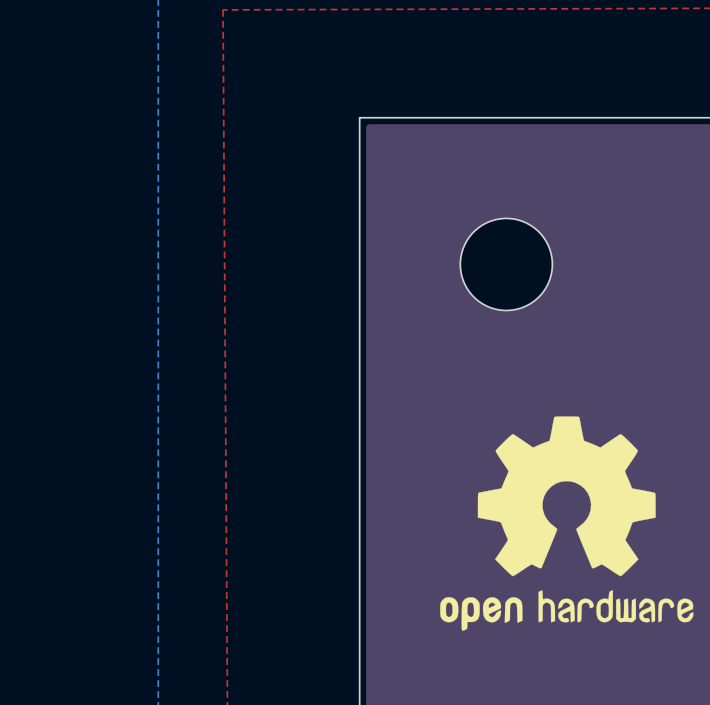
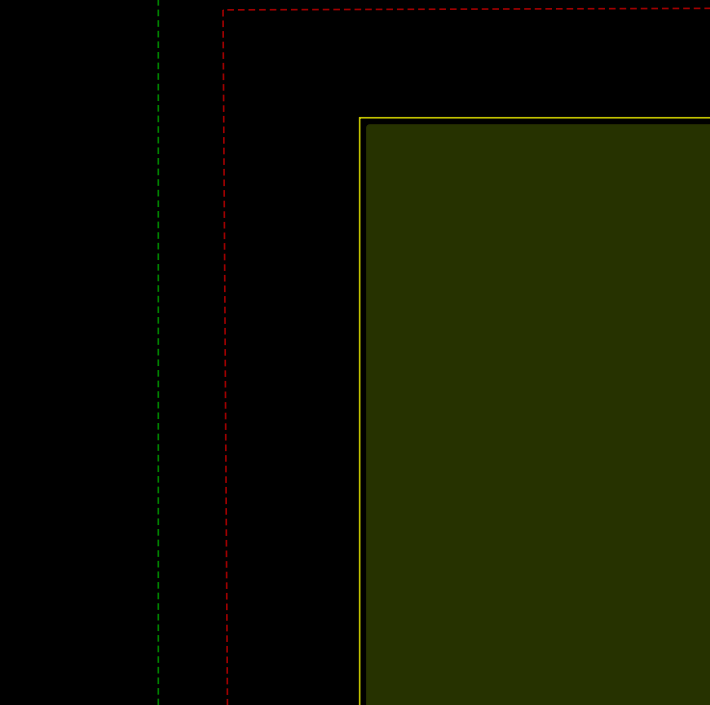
part: (506, 264) -> none
drawing: [440, 416, 694, 631] -> none

